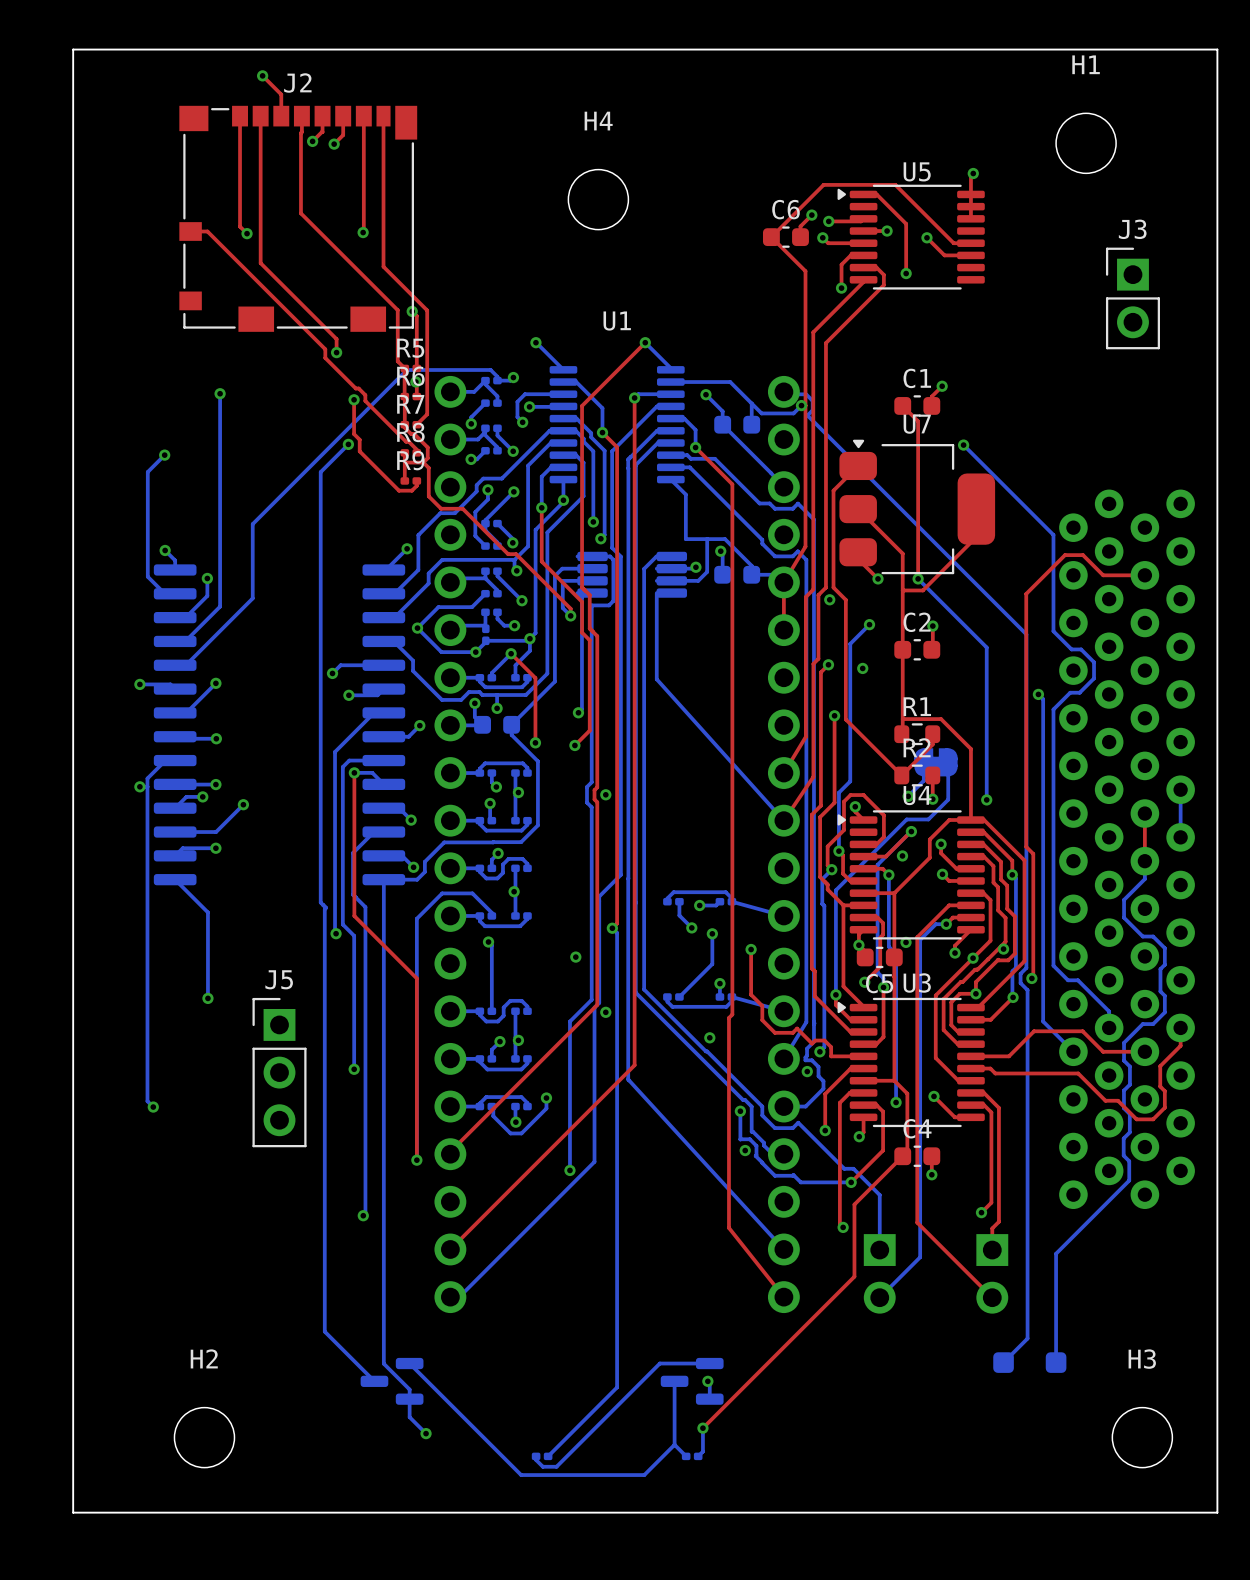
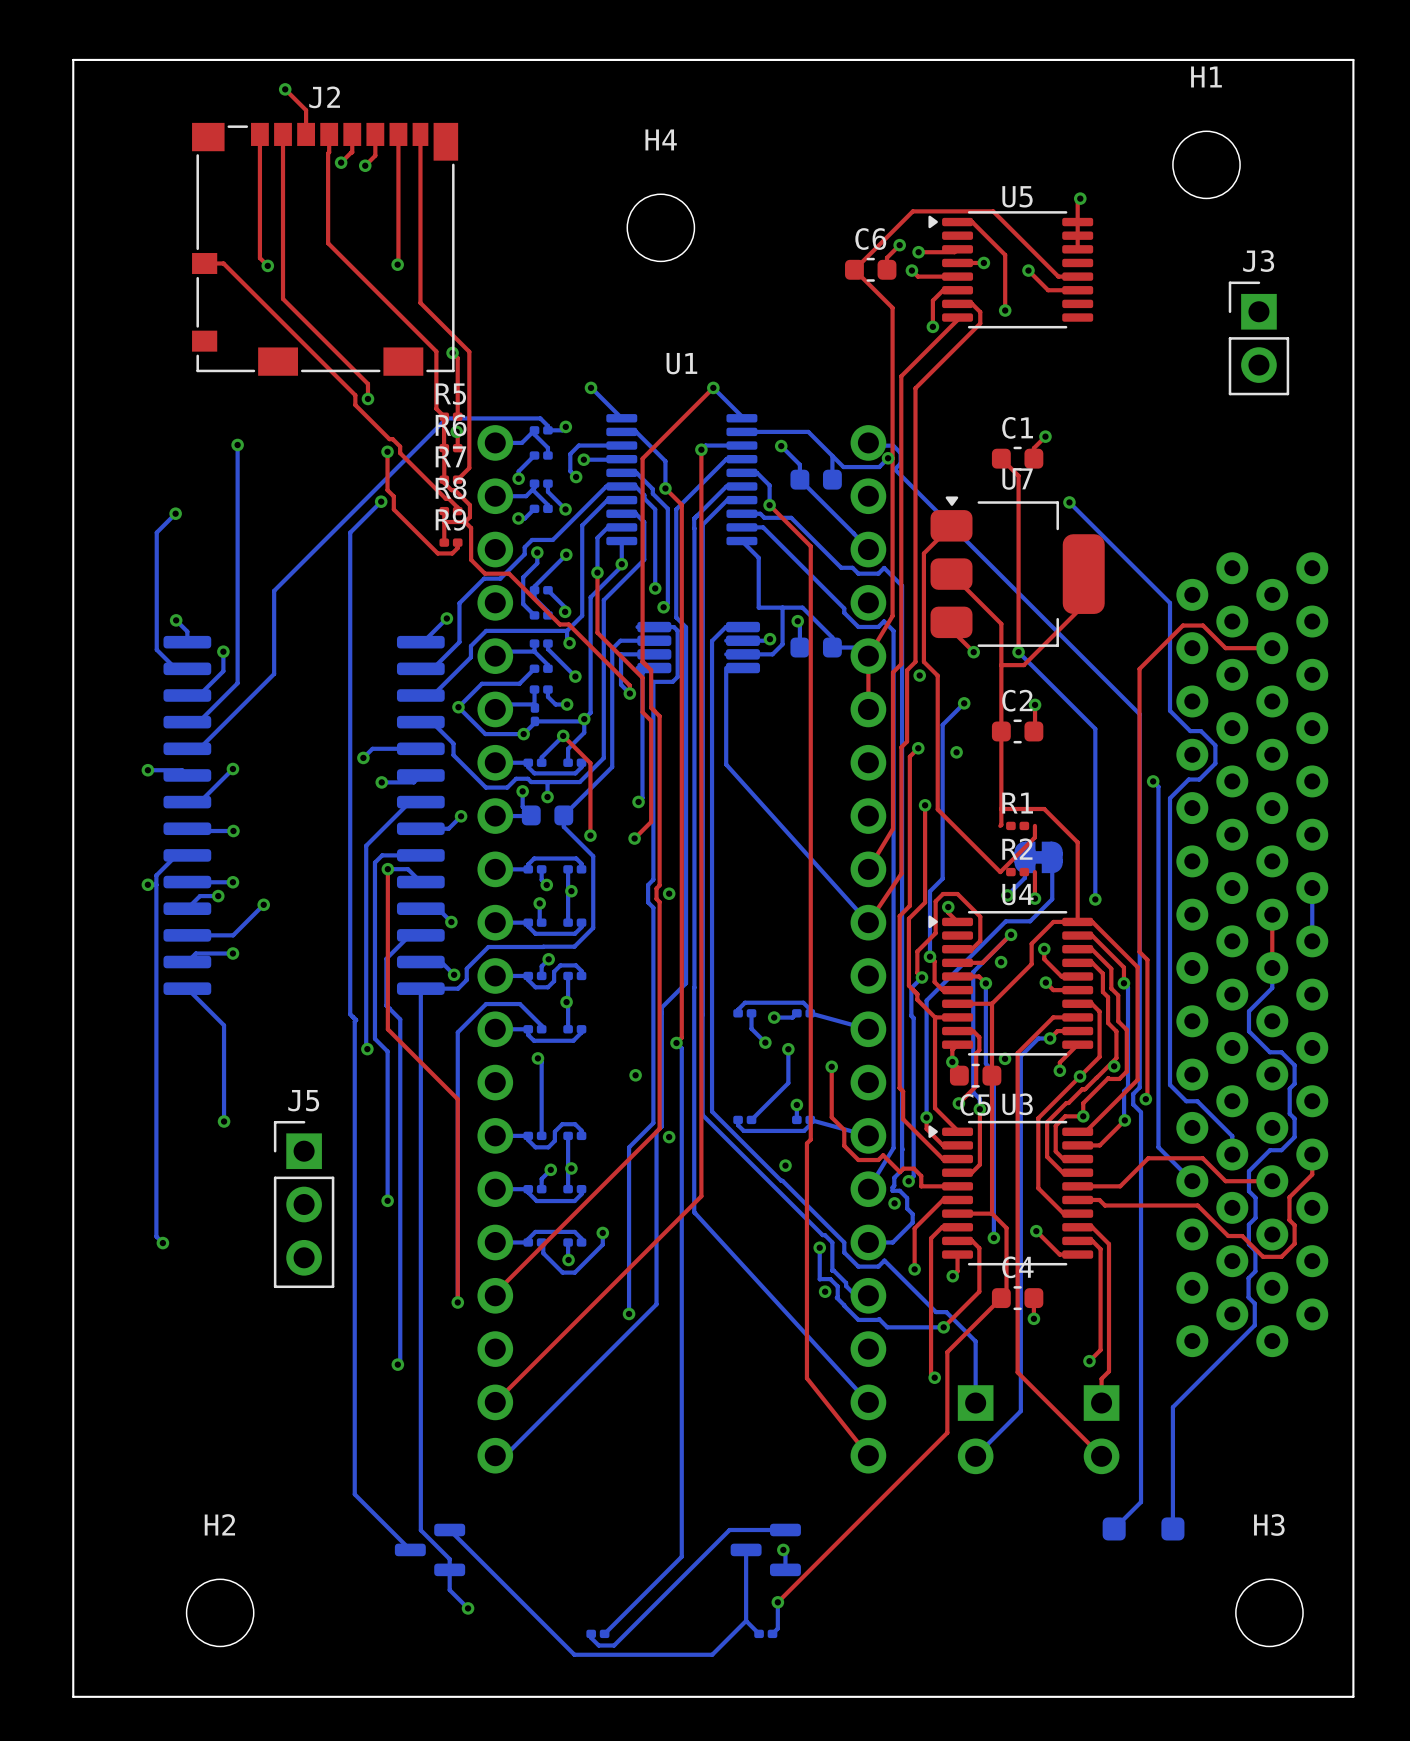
R1 footprint: [894, 723, 941, 746] -> [1006, 821, 1030, 831]
R2 footprint: [894, 764, 941, 787] -> [1006, 867, 1030, 877]

